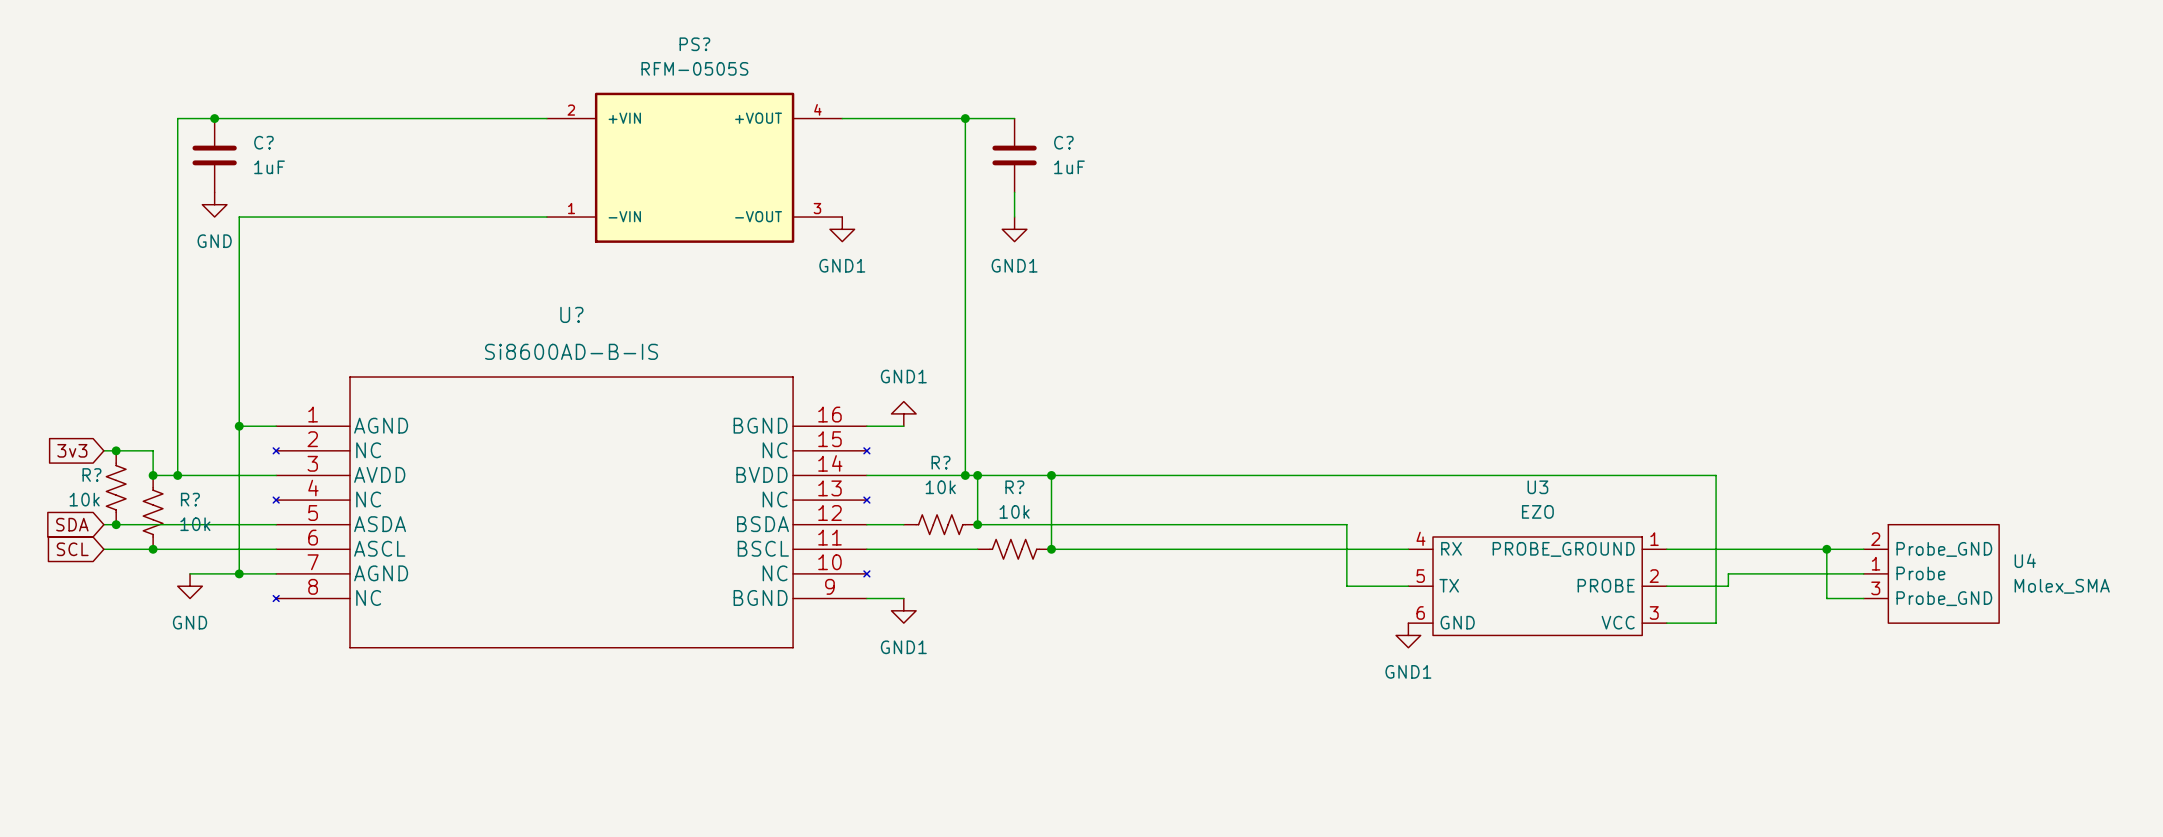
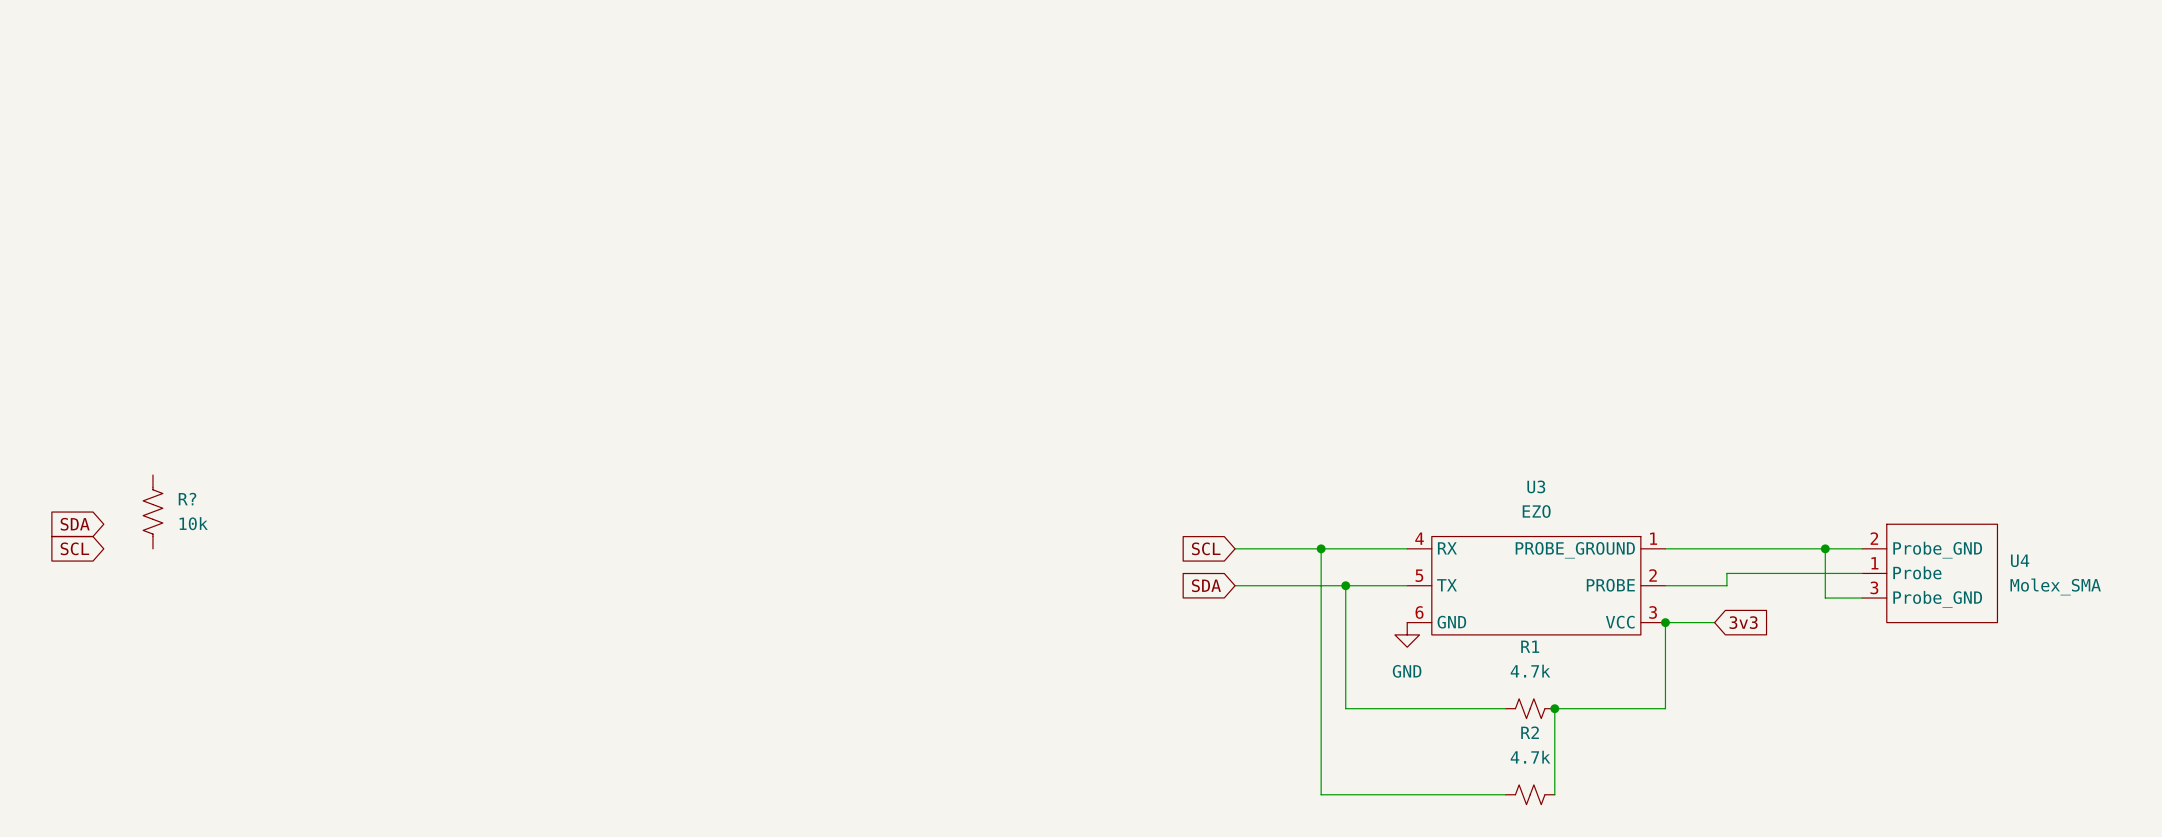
junction: (214, 118) -> none
wire: (546, 118) (177, 118) (177, 475) -> none
wire: (842, 118) (1014, 118) -> none
wire: (965, 118) (965, 475) -> none
junction: (965, 118) -> none
C?: 1uF (214, 155) -> none
C?: 1uF (1014, 155) -> none
PS?: RFM-0505S (694, 167) -> none
wire: (1014, 192) (1014, 217) -> none
power symbol: GND (214, 204) -> none
wire: (546, 217) (239, 217) (239, 573) -> none
power symbol: GND1 (842, 229) -> none
power symbol: GND1 (1014, 229) -> none
power symbol: GND1 (903, 413) -> none
wire: (239, 426) (276, 426) -> none
junction: (239, 426) -> none
wire: (866, 426) (903, 426) -> none
global label: 3v3 (72, 450) -> none
wire: (103, 450) (153, 450) (153, 475) (276, 475) -> none
junction: (116, 450) -> none
junction: (153, 475) -> none
junction: (177, 475) -> none
wire: (866, 475) (1716, 475) (1716, 623) -> none
junction: (965, 475) -> none
wire: (977, 475) (977, 524) (1346, 524) (1346, 586) -> none
junction: (977, 475) -> none
wire: (1051, 475) (1051, 549) (1236, 549) -> none
junction: (1051, 475) -> none
R?: 10k (116, 487) -> none
U?: Si8600AD-B-IS (571, 512) -> none
wire: (103, 524) (276, 524) -> none
junction: (116, 524) -> none
wire: (866, 524) (903, 524) -> none
R?: 10k (940, 524) -> none
junction: (977, 524) -> none
wire: (103, 549) (276, 549) -> none
junction: (153, 549) -> none
wire: (866, 549) (977, 549) -> none
R?: 10k (1014, 549) -> none
junction: (1051, 549) -> none
global label: none -> SCL (1206, 548)
wire: none -> (1321, 548) (1321, 794) (1505, 794)
junction: none -> (1321, 548)
wire: (190, 573) (276, 573) -> none
junction: (239, 573) -> none
power symbol: GND (190, 586) -> none
global label: none -> SDA (1206, 585)
wire: none -> (1235, 585) (1345, 585) (1345, 708) (1505, 708)
junction: none -> (1345, 585)
wire: (866, 598) (903, 598) -> none
power symbol: GND1 (903, 610) -> none
wire: none -> (1665, 622) (1665, 708) (1554, 708) (1554, 794)
junction: none -> (1665, 622)
global label: none -> 3v3 (1743, 622)
power symbol: GND1 (1408, 635) -> GND (1407, 634)
R1: none -> 4.7k (1530, 708)
junction: none -> (1554, 708)
R2: none -> 4.7k (1530, 794)

